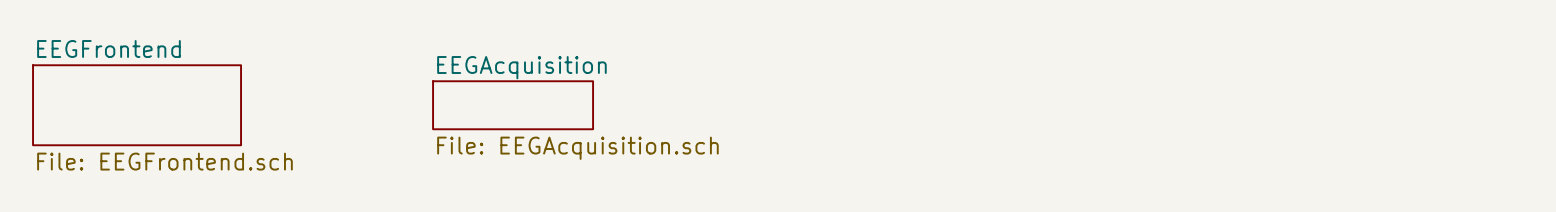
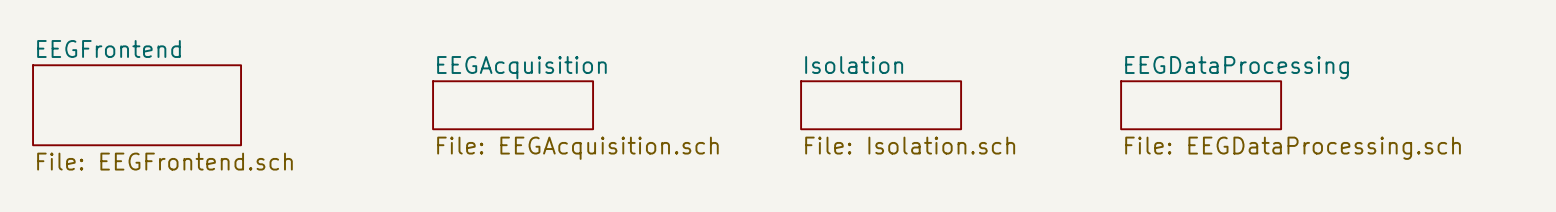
sheet Isolation: none -> File: Isolation.sch (881, 105)
sheet EEGDataProcessing: none -> File: EEGDataProcessing.sch (1201, 105)

